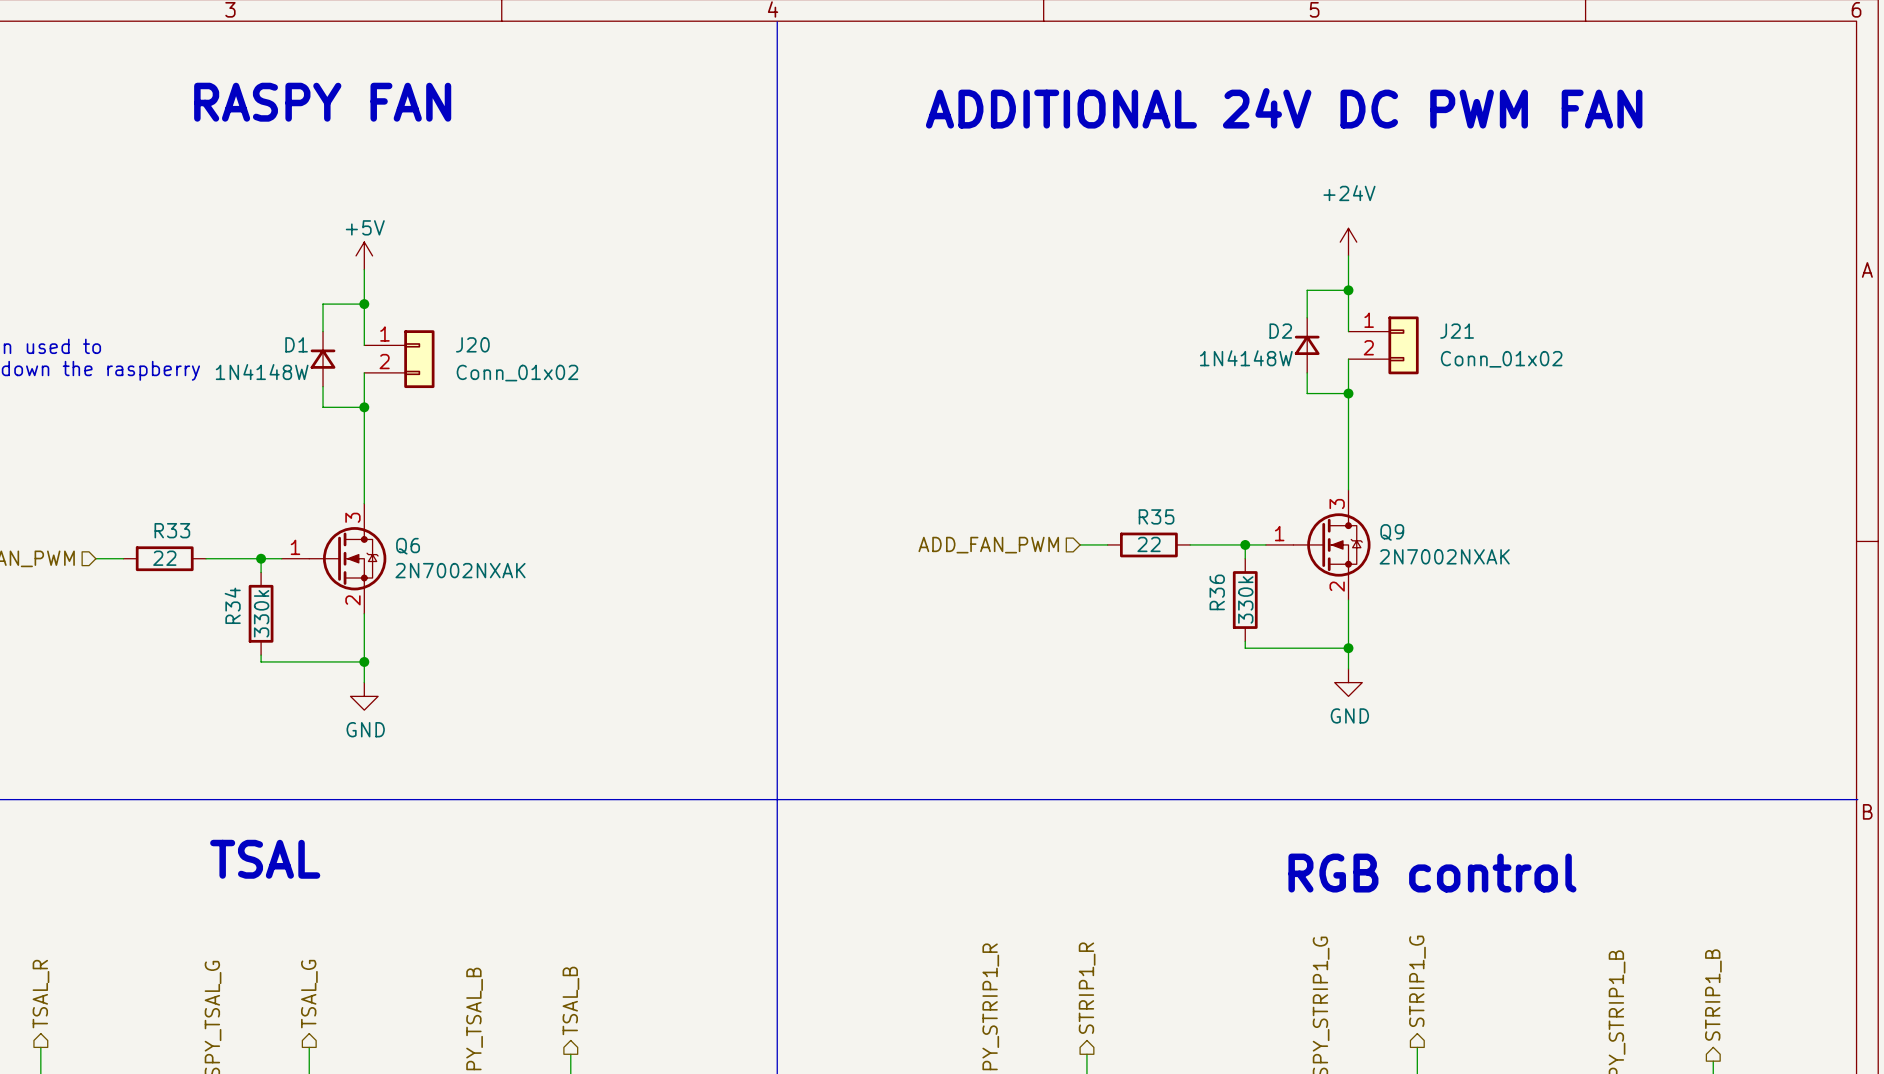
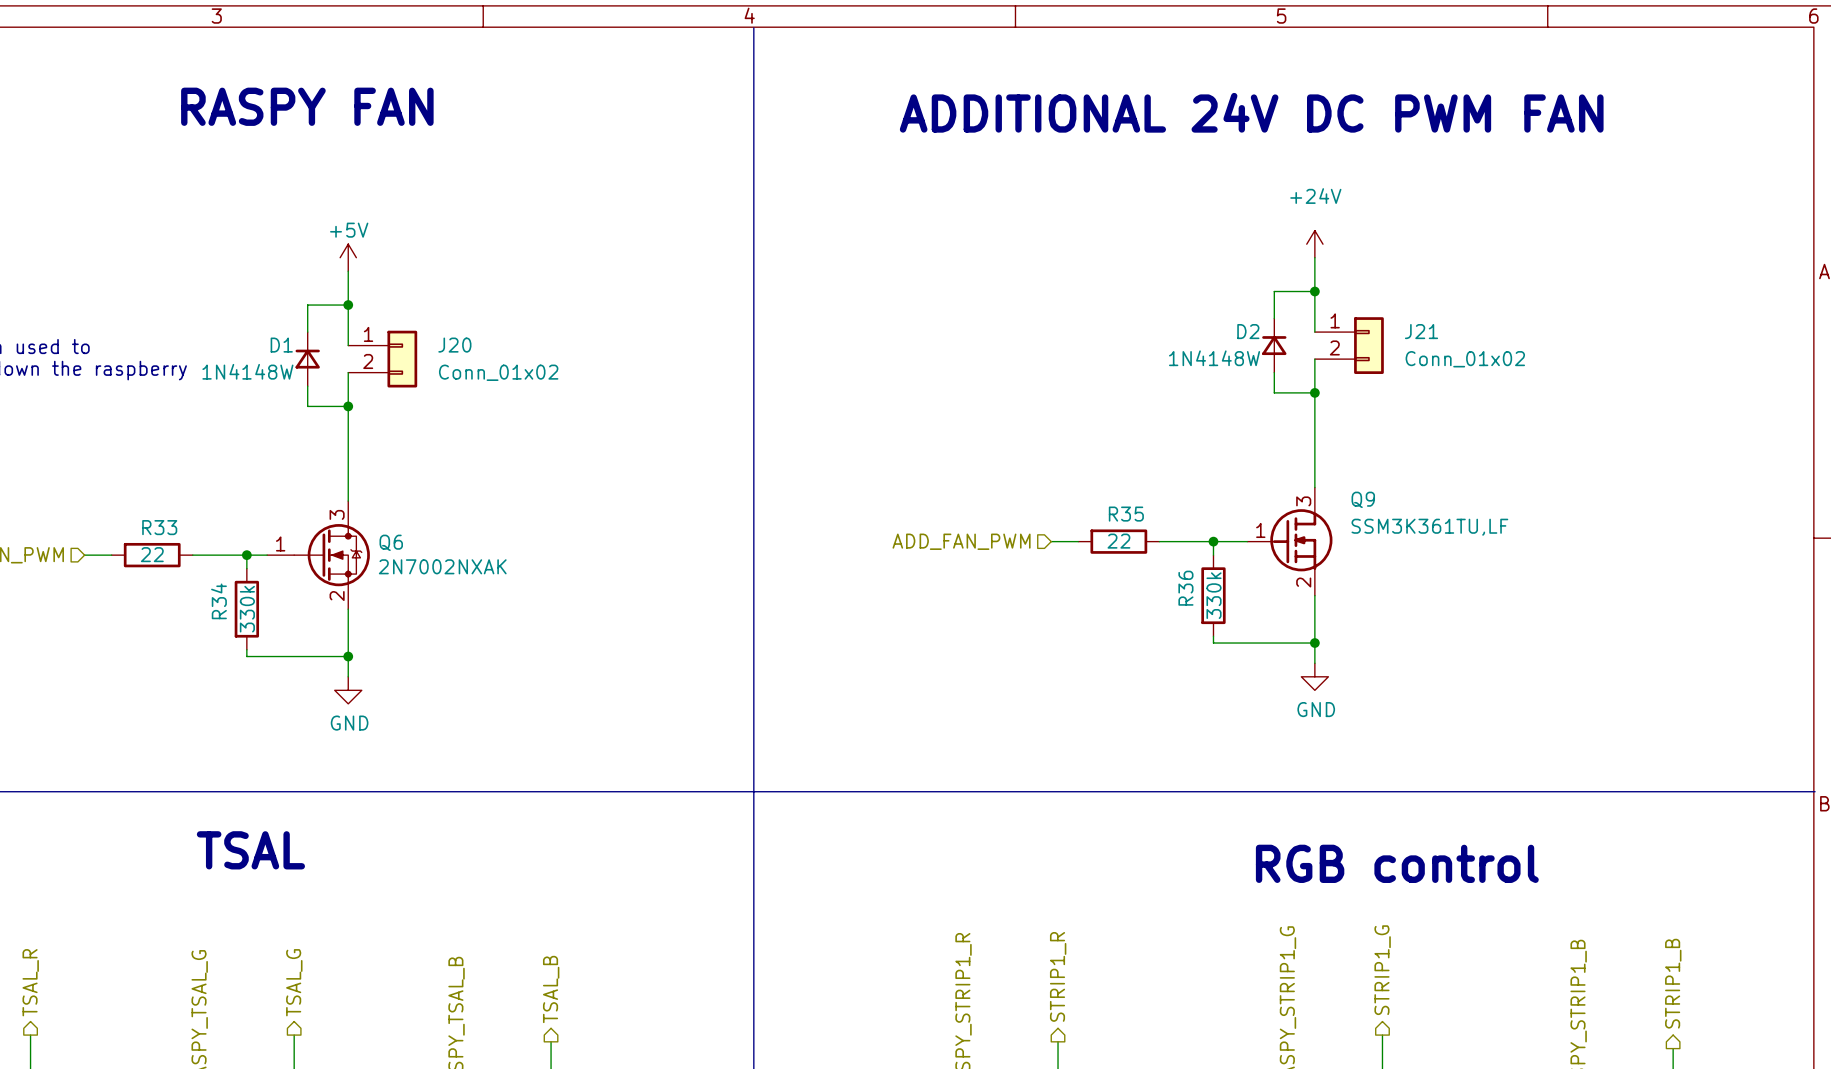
Q9 symbol: [1265, 489, 1371, 601] -> [1247, 487, 1333, 596]
Q9 name position: Q9 (1392, 532) -> Q9 (1363, 499)
Q9 value: 2N7002NXAK (1444, 556) -> SSM3K361TU,LF (1429, 527)

